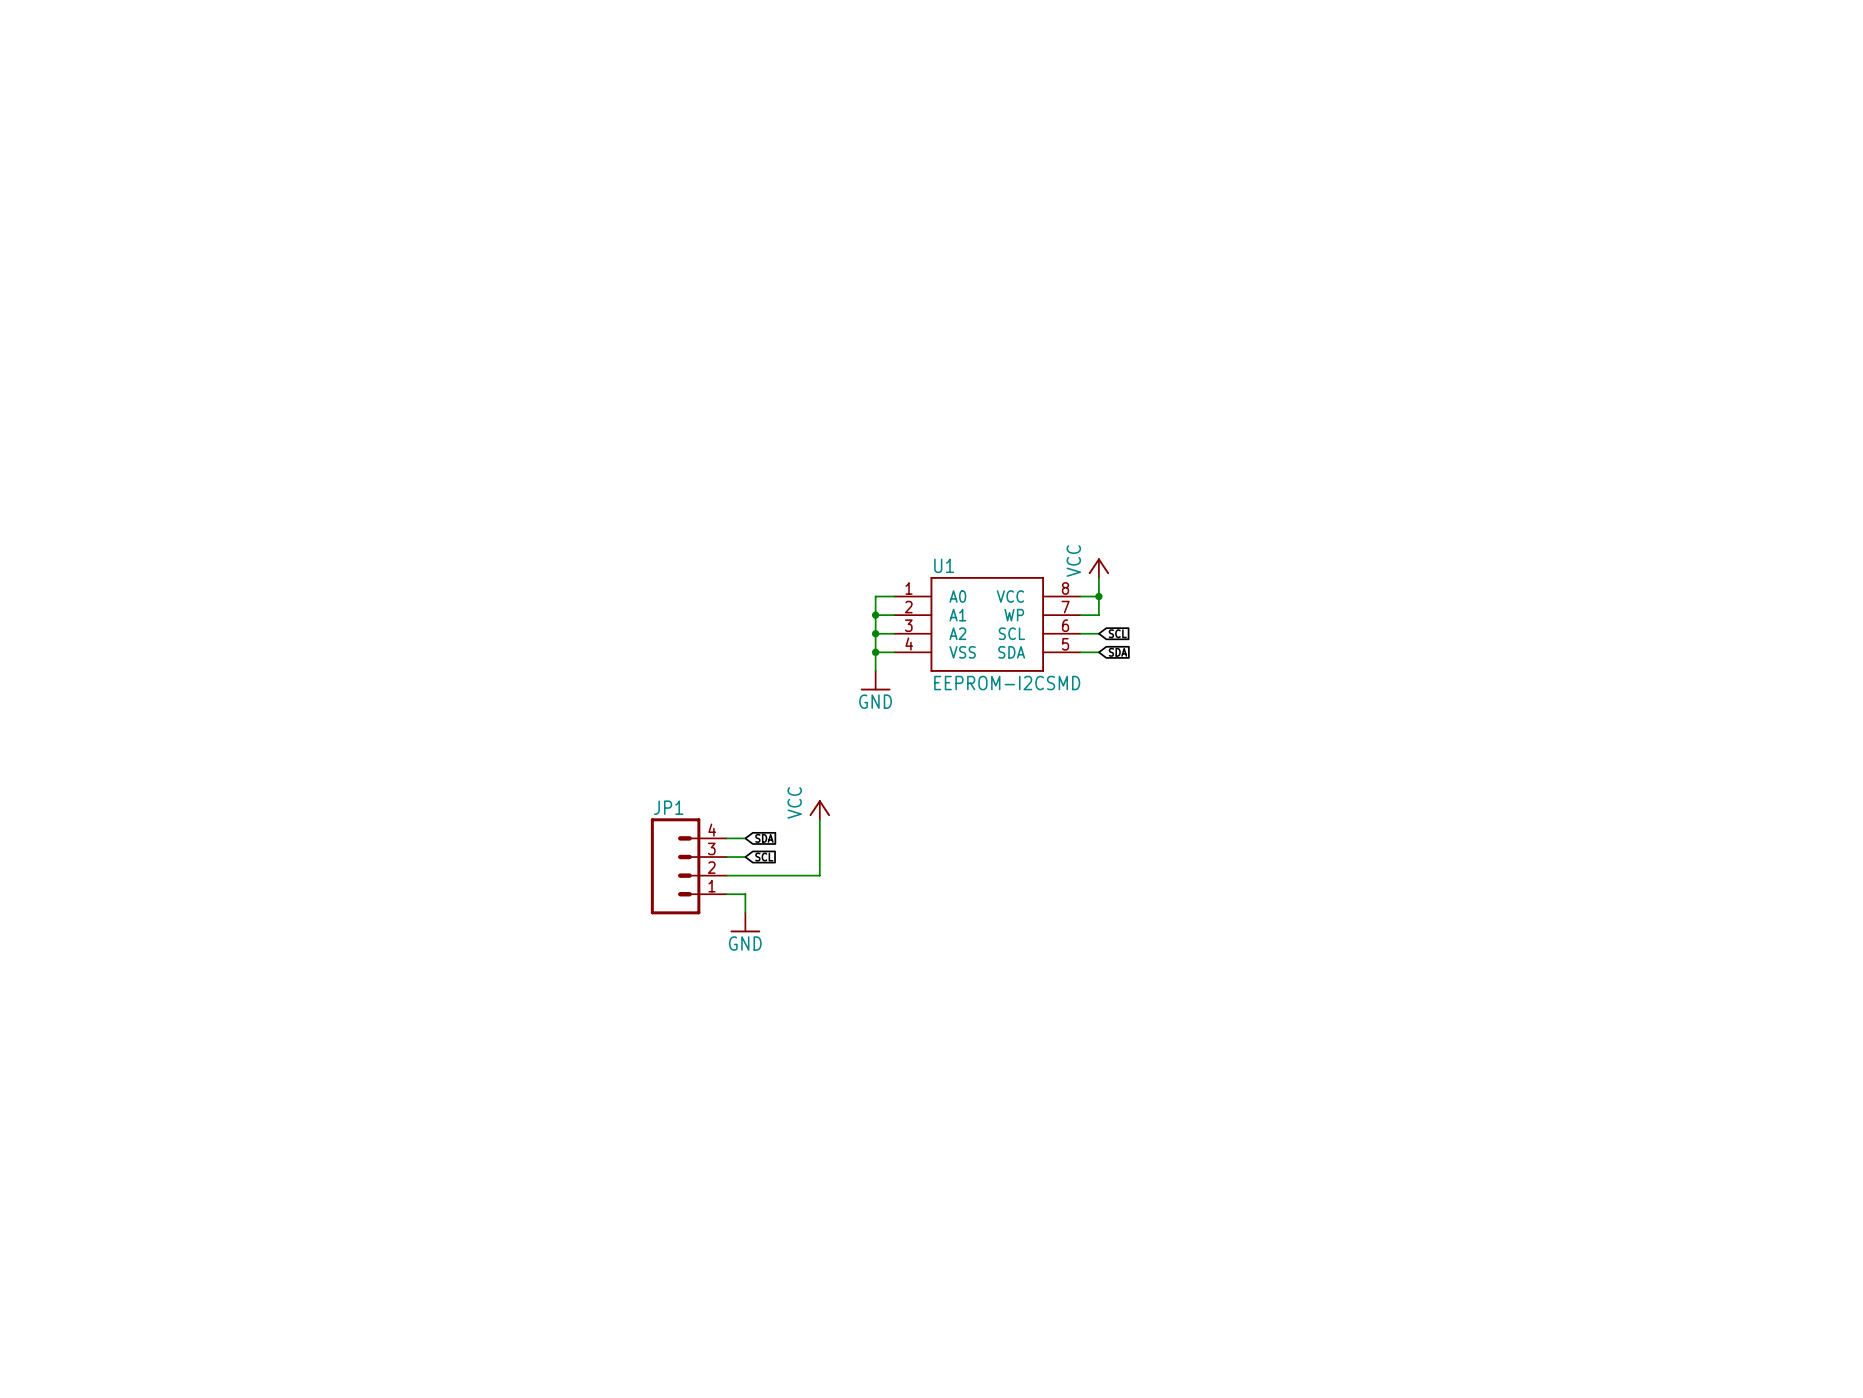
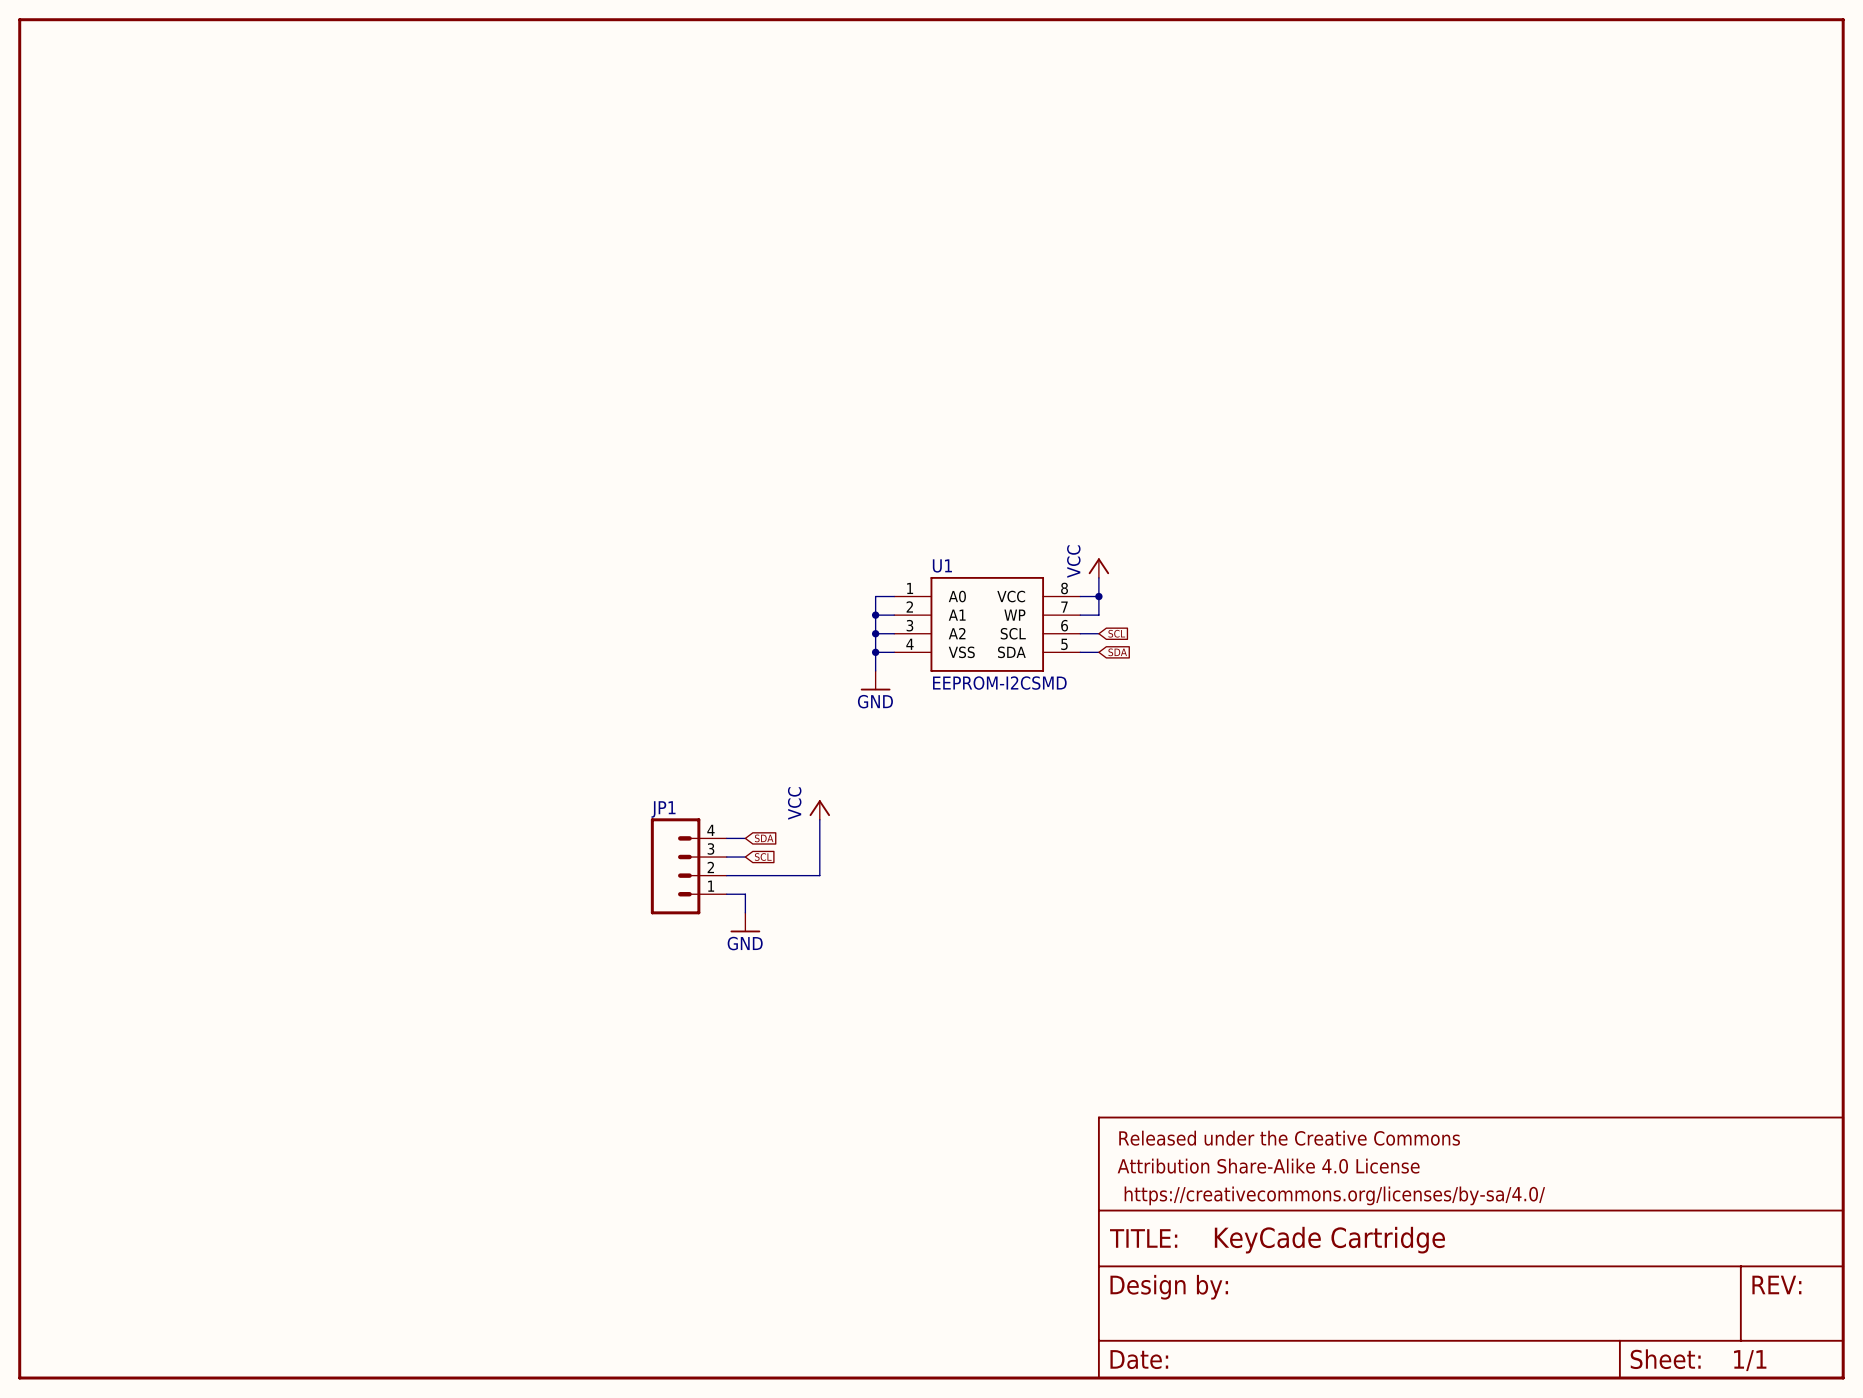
part: none -> (931, 698)
part: none -> (1471, 1247)

